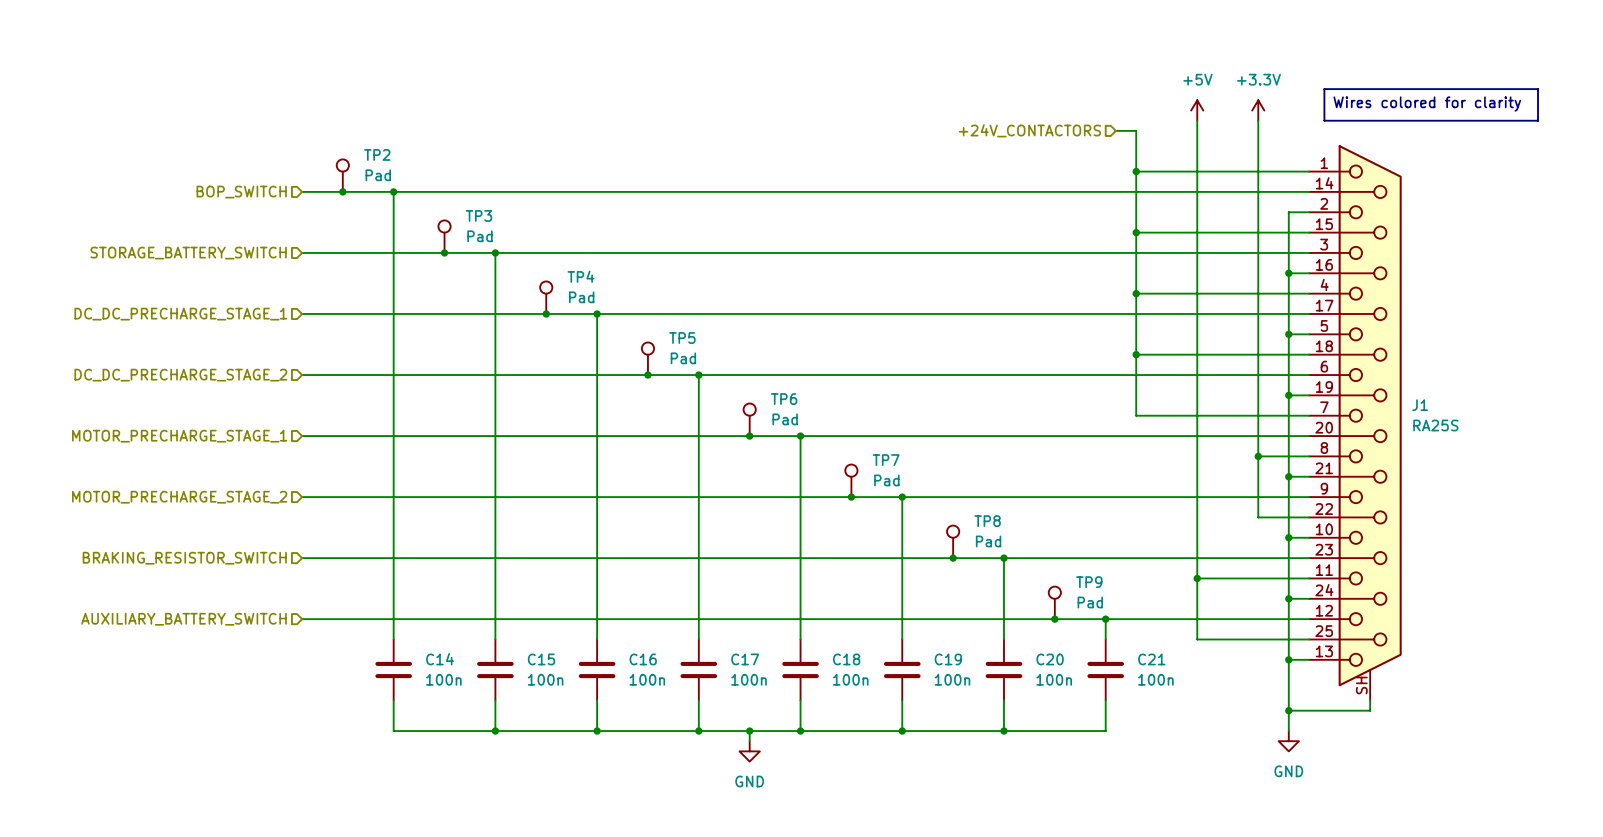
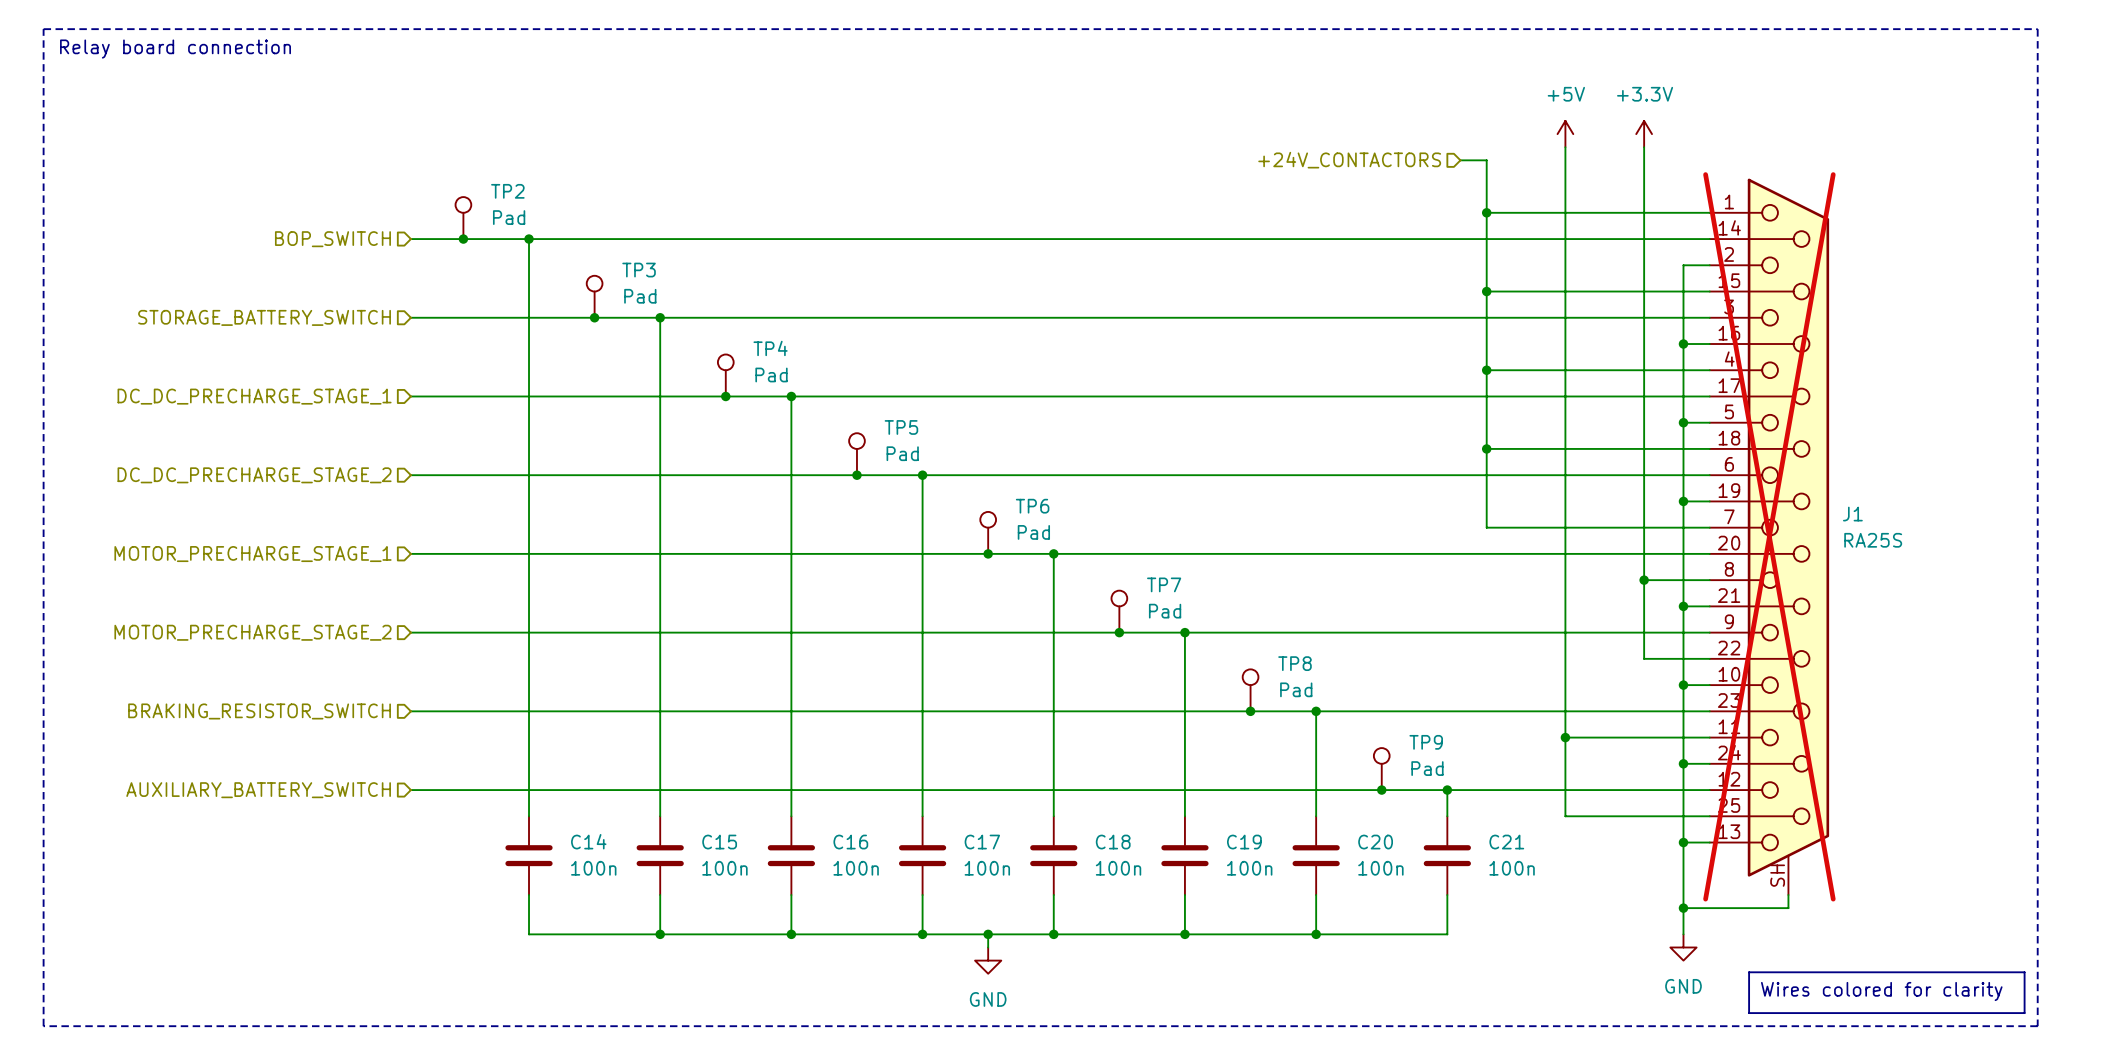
line: none -> (43, 29) (2037, 29) (2037, 1026) (43, 1026) (43, 29)
text: none -> Relay board connection (175, 49)
line: (1324, 89) (1538, 89) (1538, 120) (1324, 120) (1324, 89) -> none
text: Wires colored for clarity (1427, 104) -> none
J1 do-not-place cross: none -> (1769, 536)
line: none -> (1749, 972) (2024, 972) (2024, 1013) (1749, 1013) (1749, 972)
text: none -> Wires colored for clarity (1881, 991)

